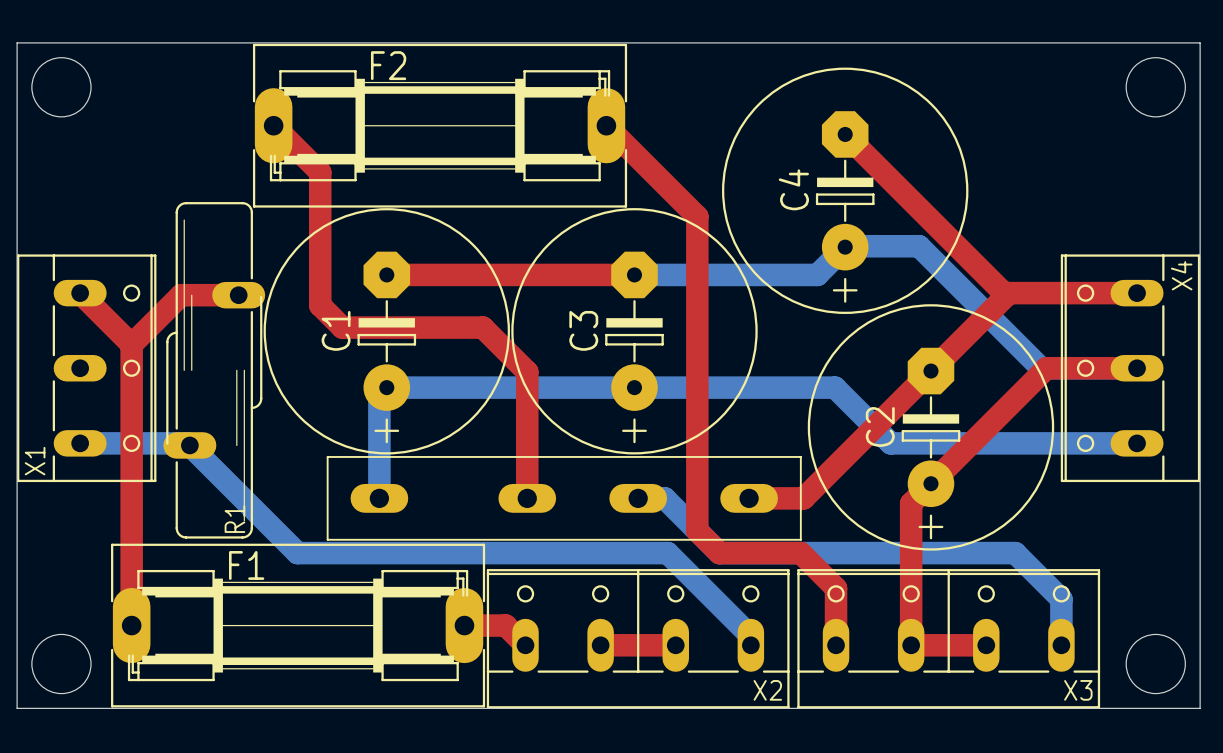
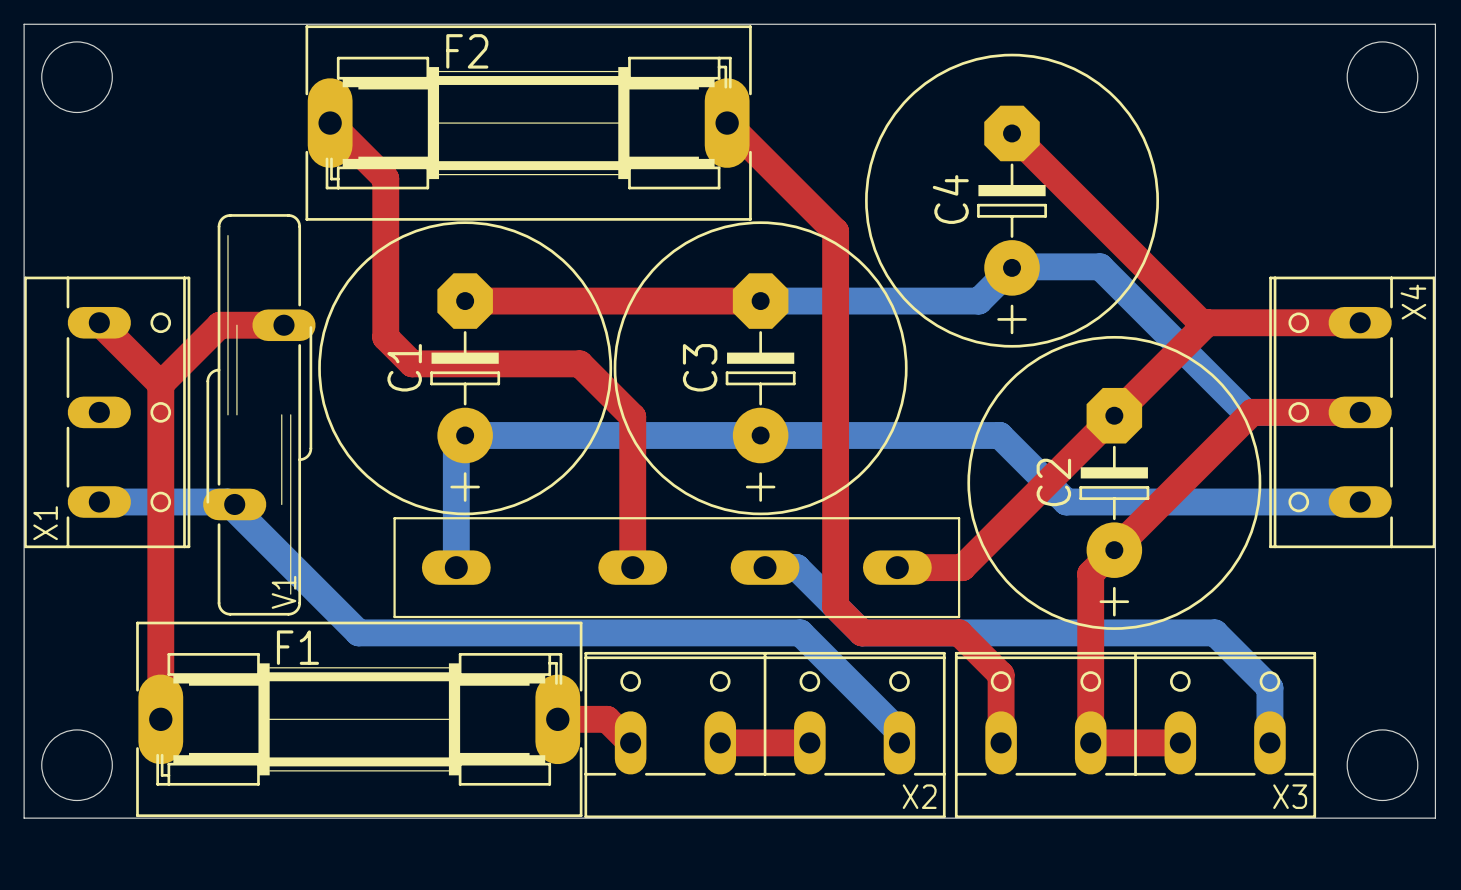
R1: (214, 370) -> none
V1: none -> (259, 414)

